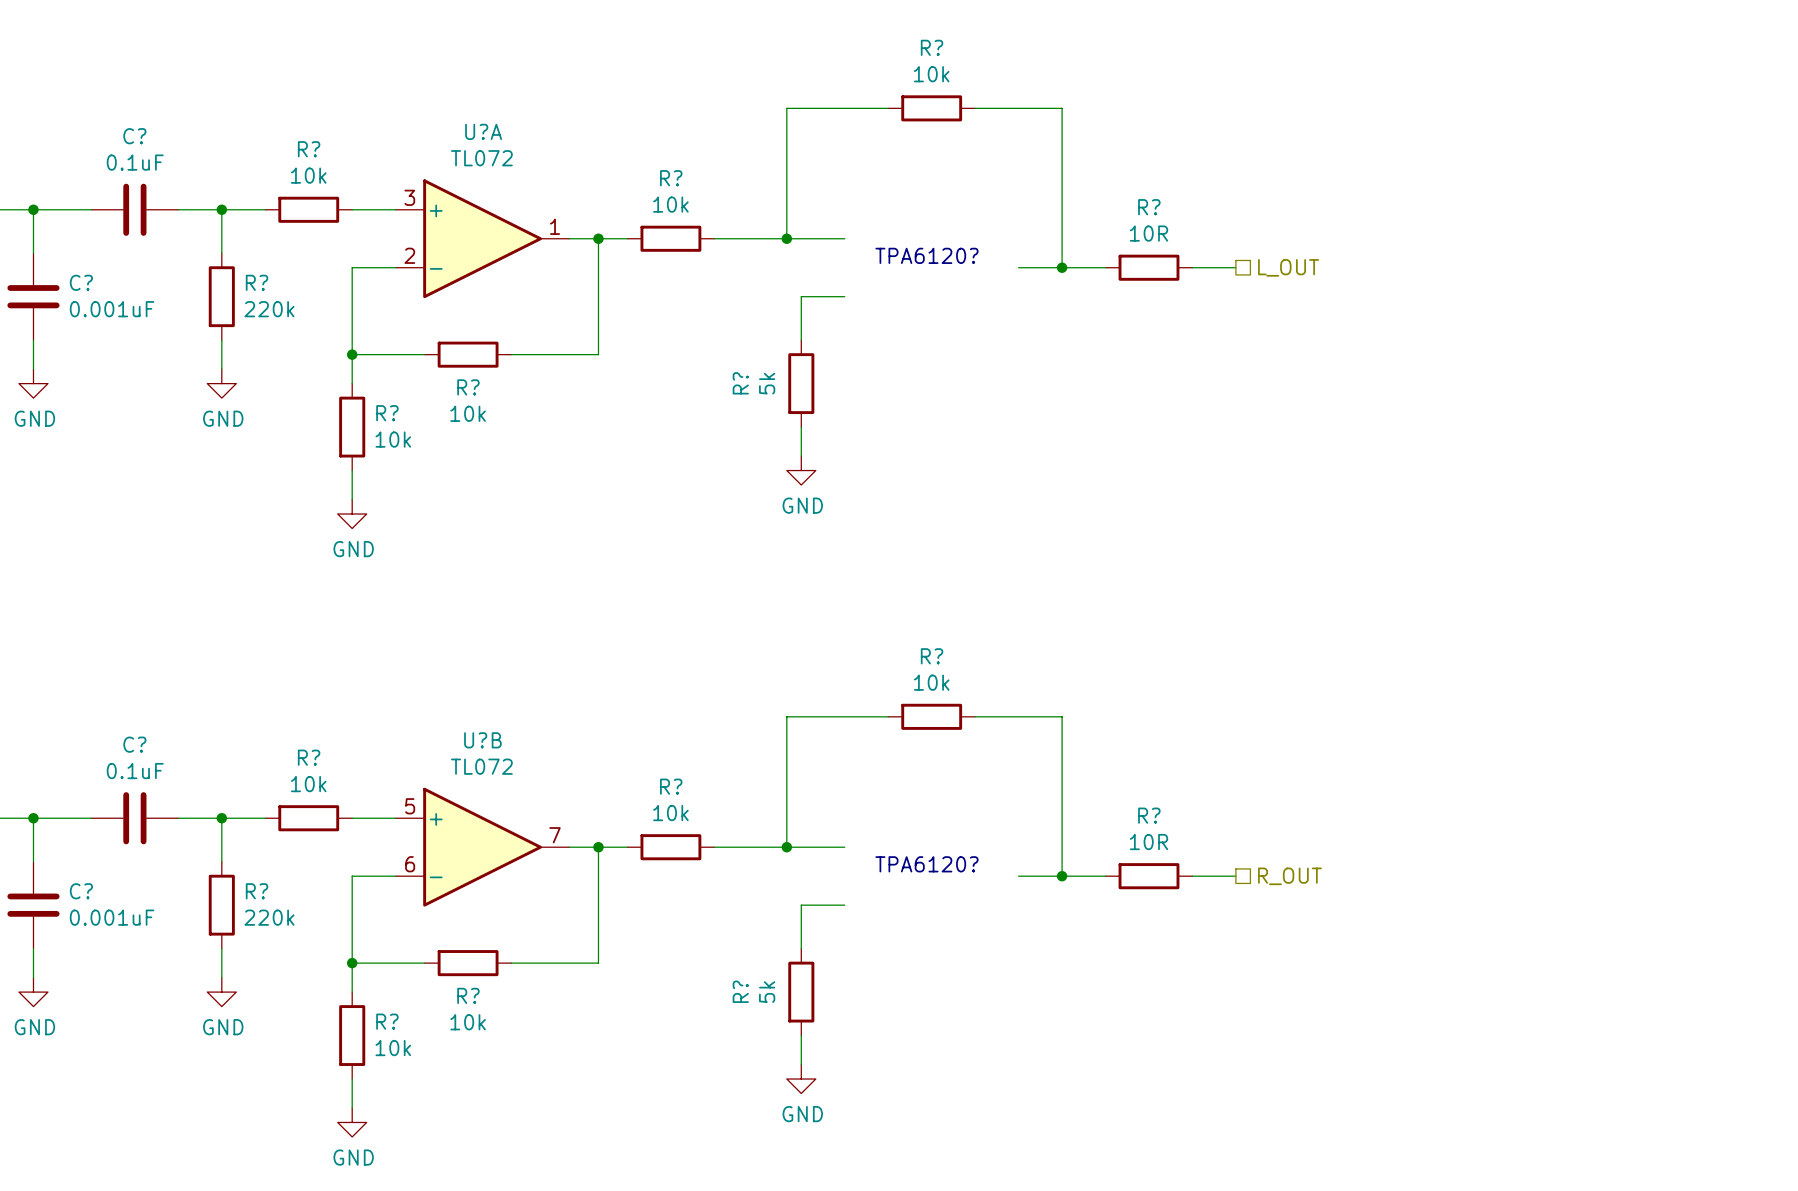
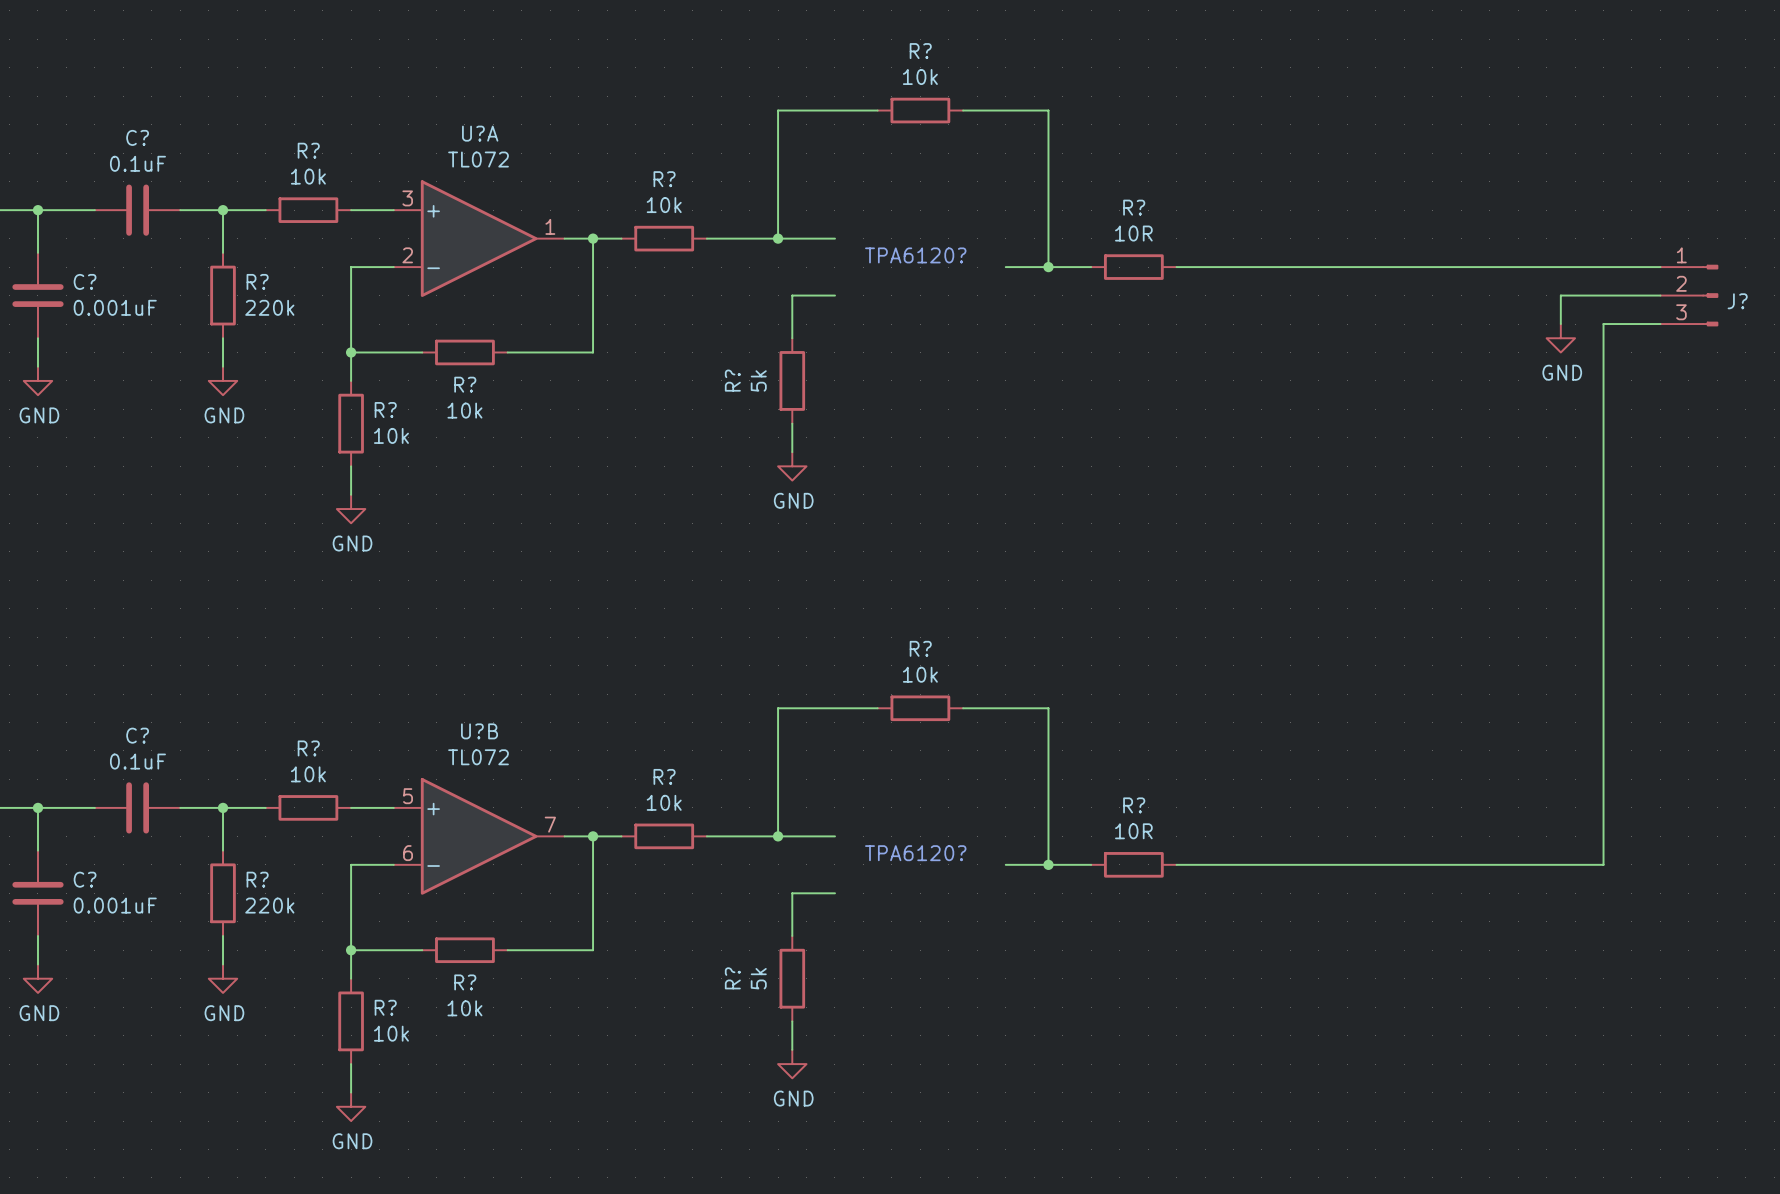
wire: none -> (1219, 267) (1660, 267)
hierarchical label: L_OUT (1288, 267) -> none
wire: none -> (1660, 295) (1560, 295) (1560, 324)
J?: none -> (1689, 295)
wire: none -> (1660, 324) (1603, 324) (1603, 864) (1219, 864)
power symbol: none -> GND (1560, 338)
hierarchical label: R_OUT (1289, 876) -> none

